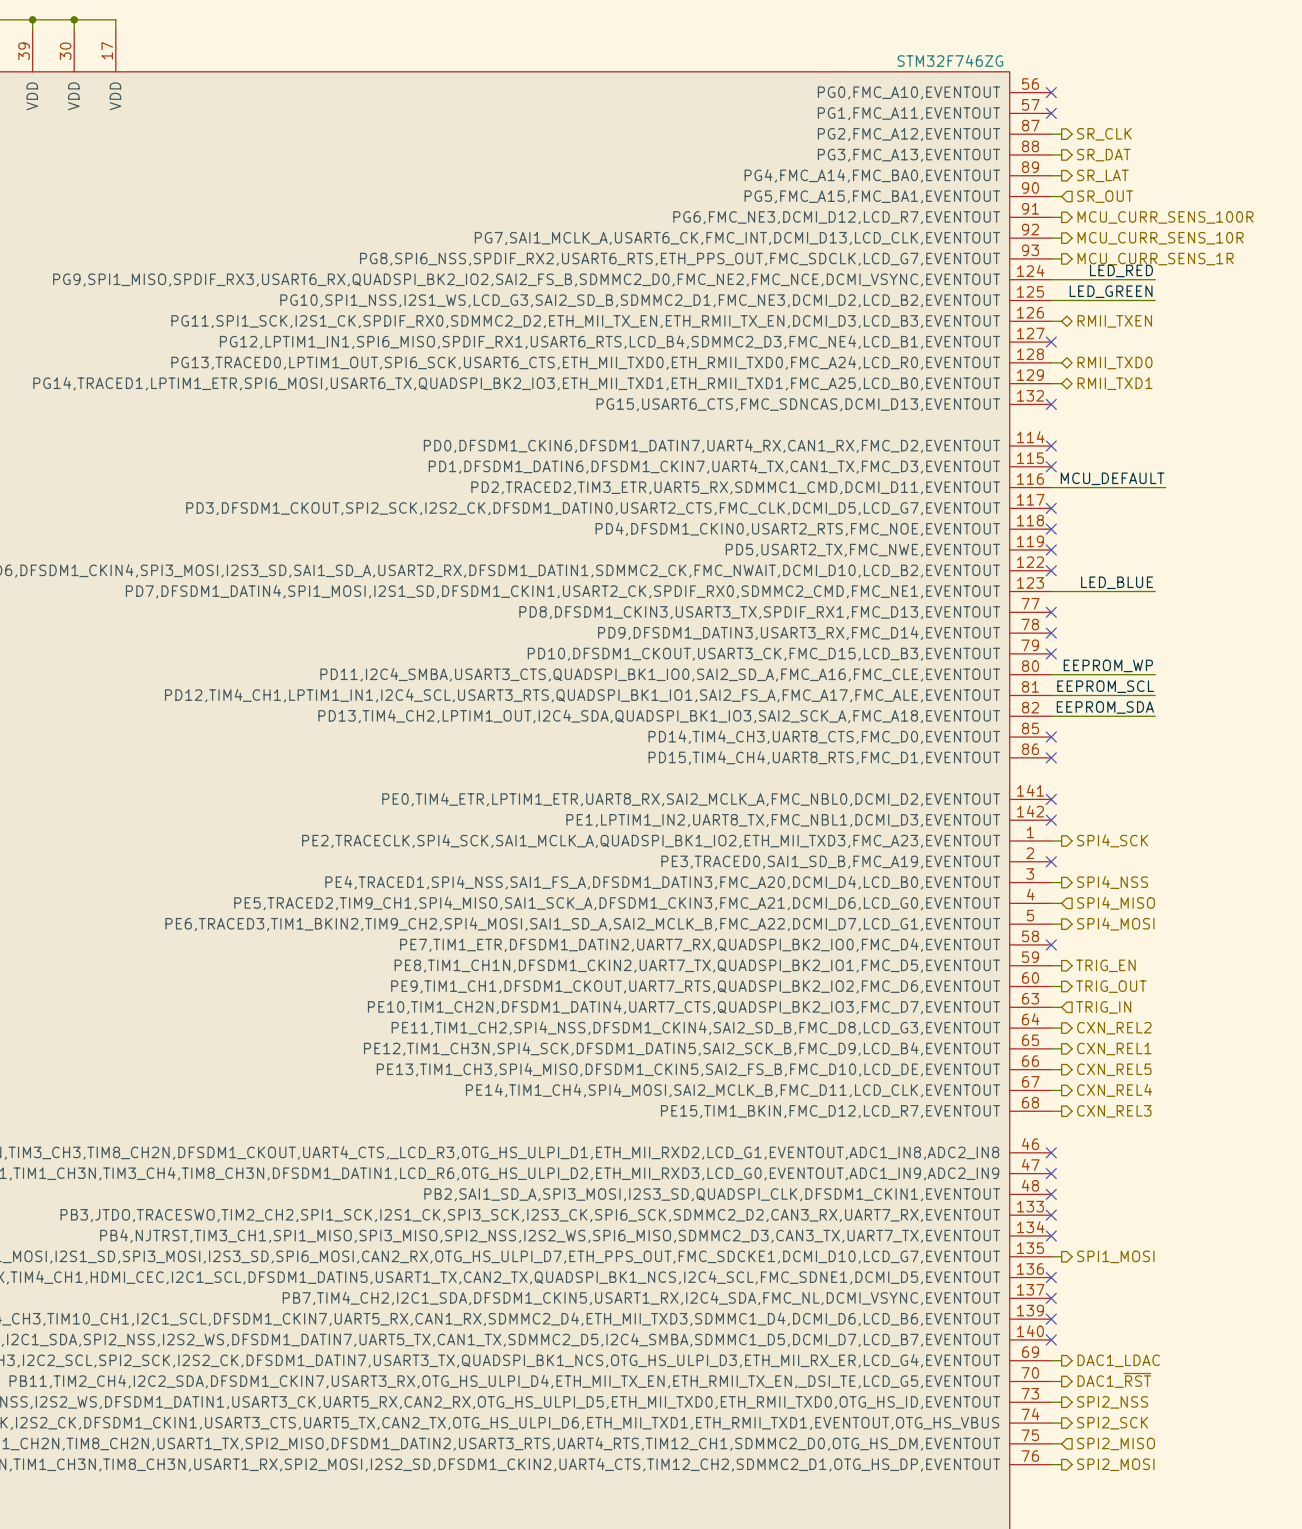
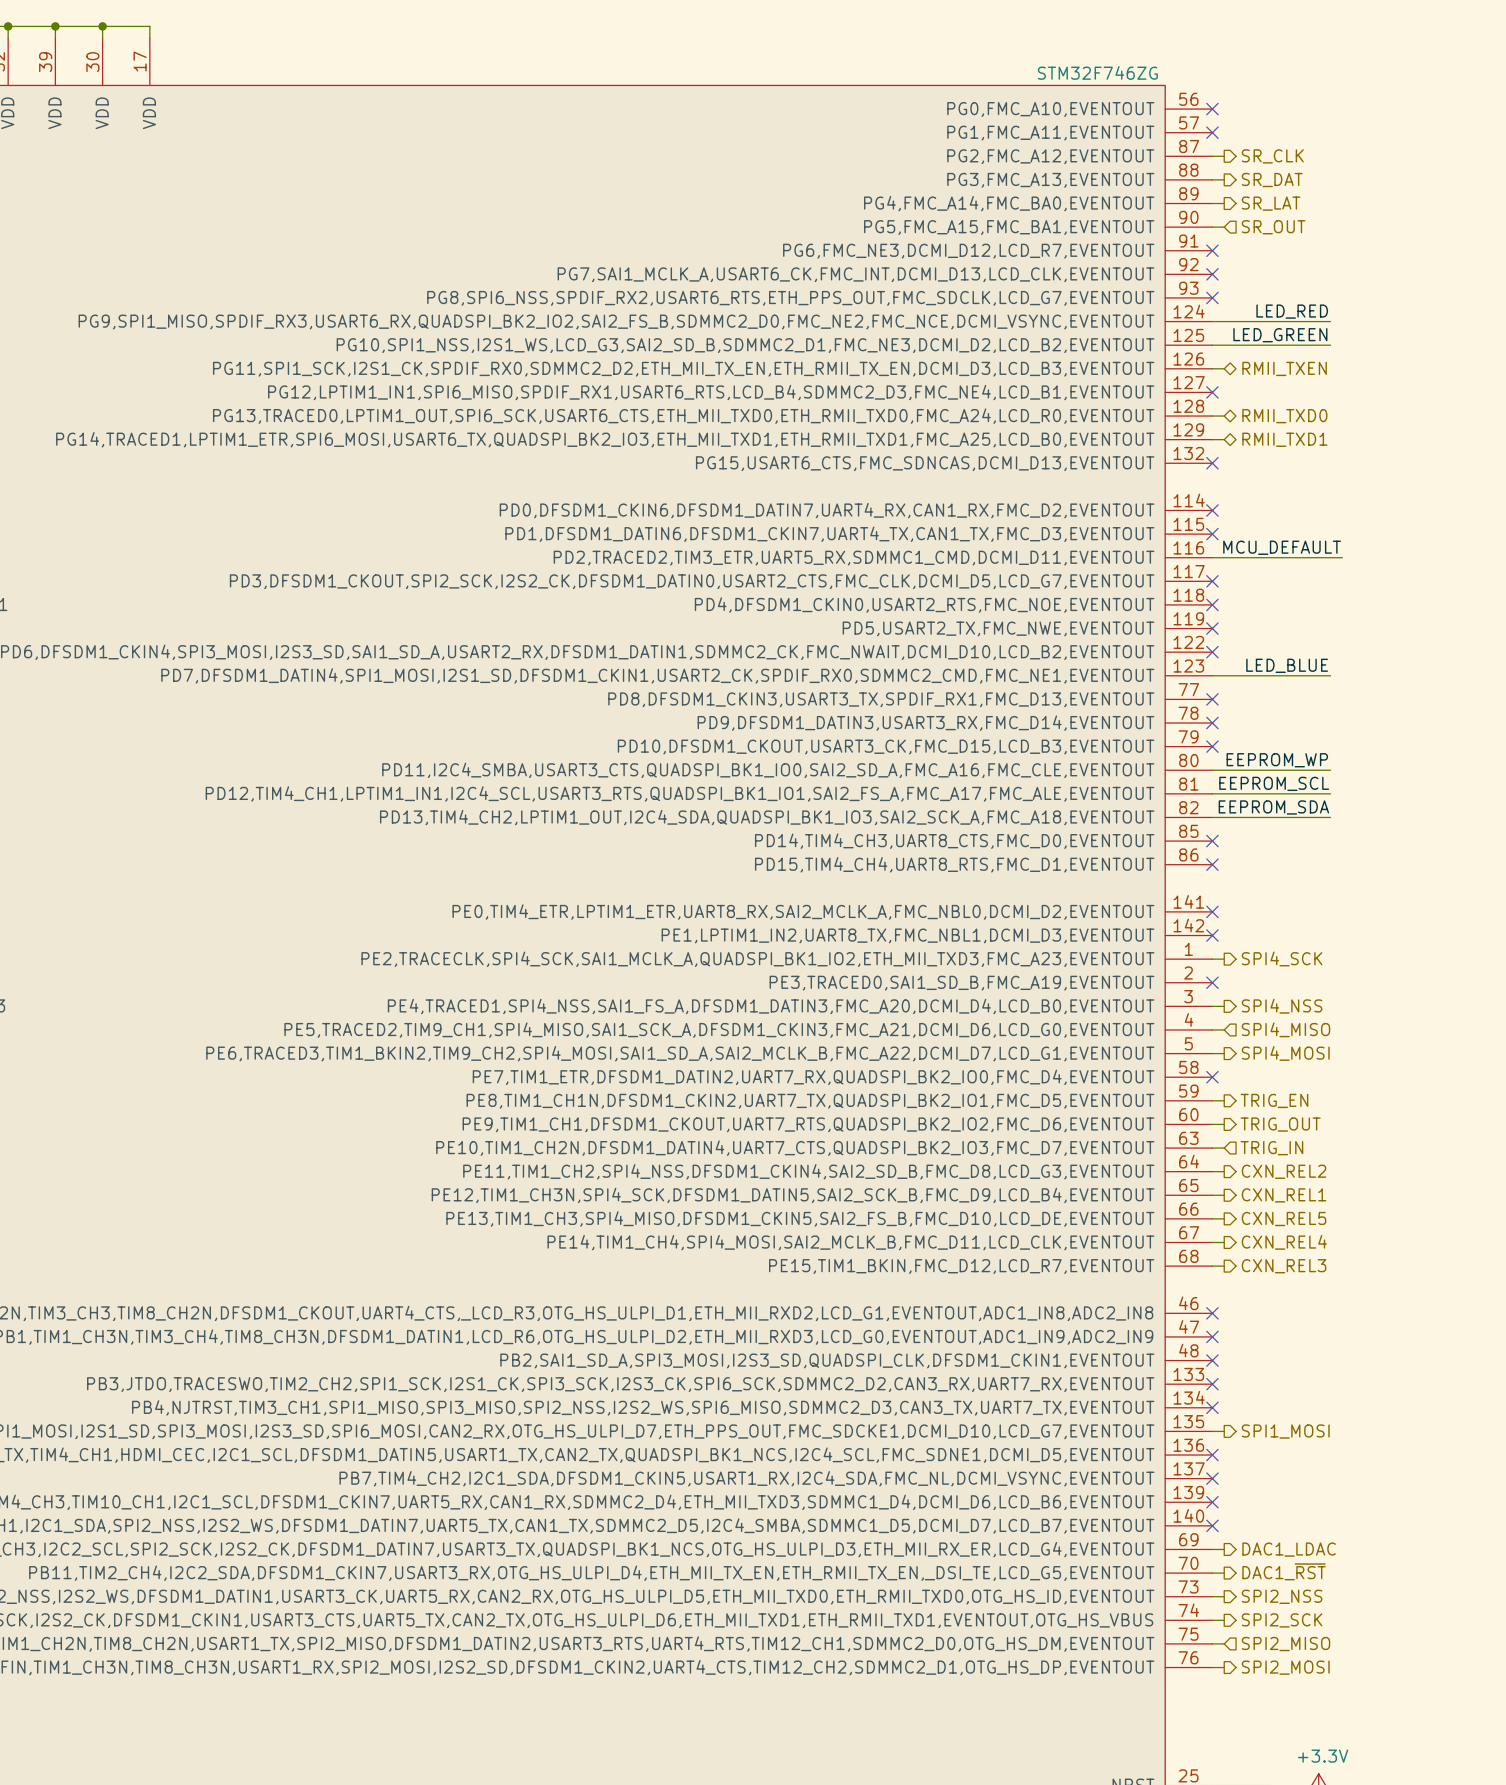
wire: (1051, 217) (1061, 217) -> none
no-connect mark: none -> (1212, 250)
hierarchical label: MCU_CURR_SENS_100R (1165, 217) -> none
wire: (1051, 238) (1061, 238) -> none
no-connect mark: none -> (1212, 274)
hierarchical label: MCU_CURR_SENS_10R (1160, 238) -> none
wire: (1051, 258) (1061, 258) -> none
no-connect mark: none -> (1212, 297)
hierarchical label: MCU_CURR_SENS_1R (1155, 259) -> none

